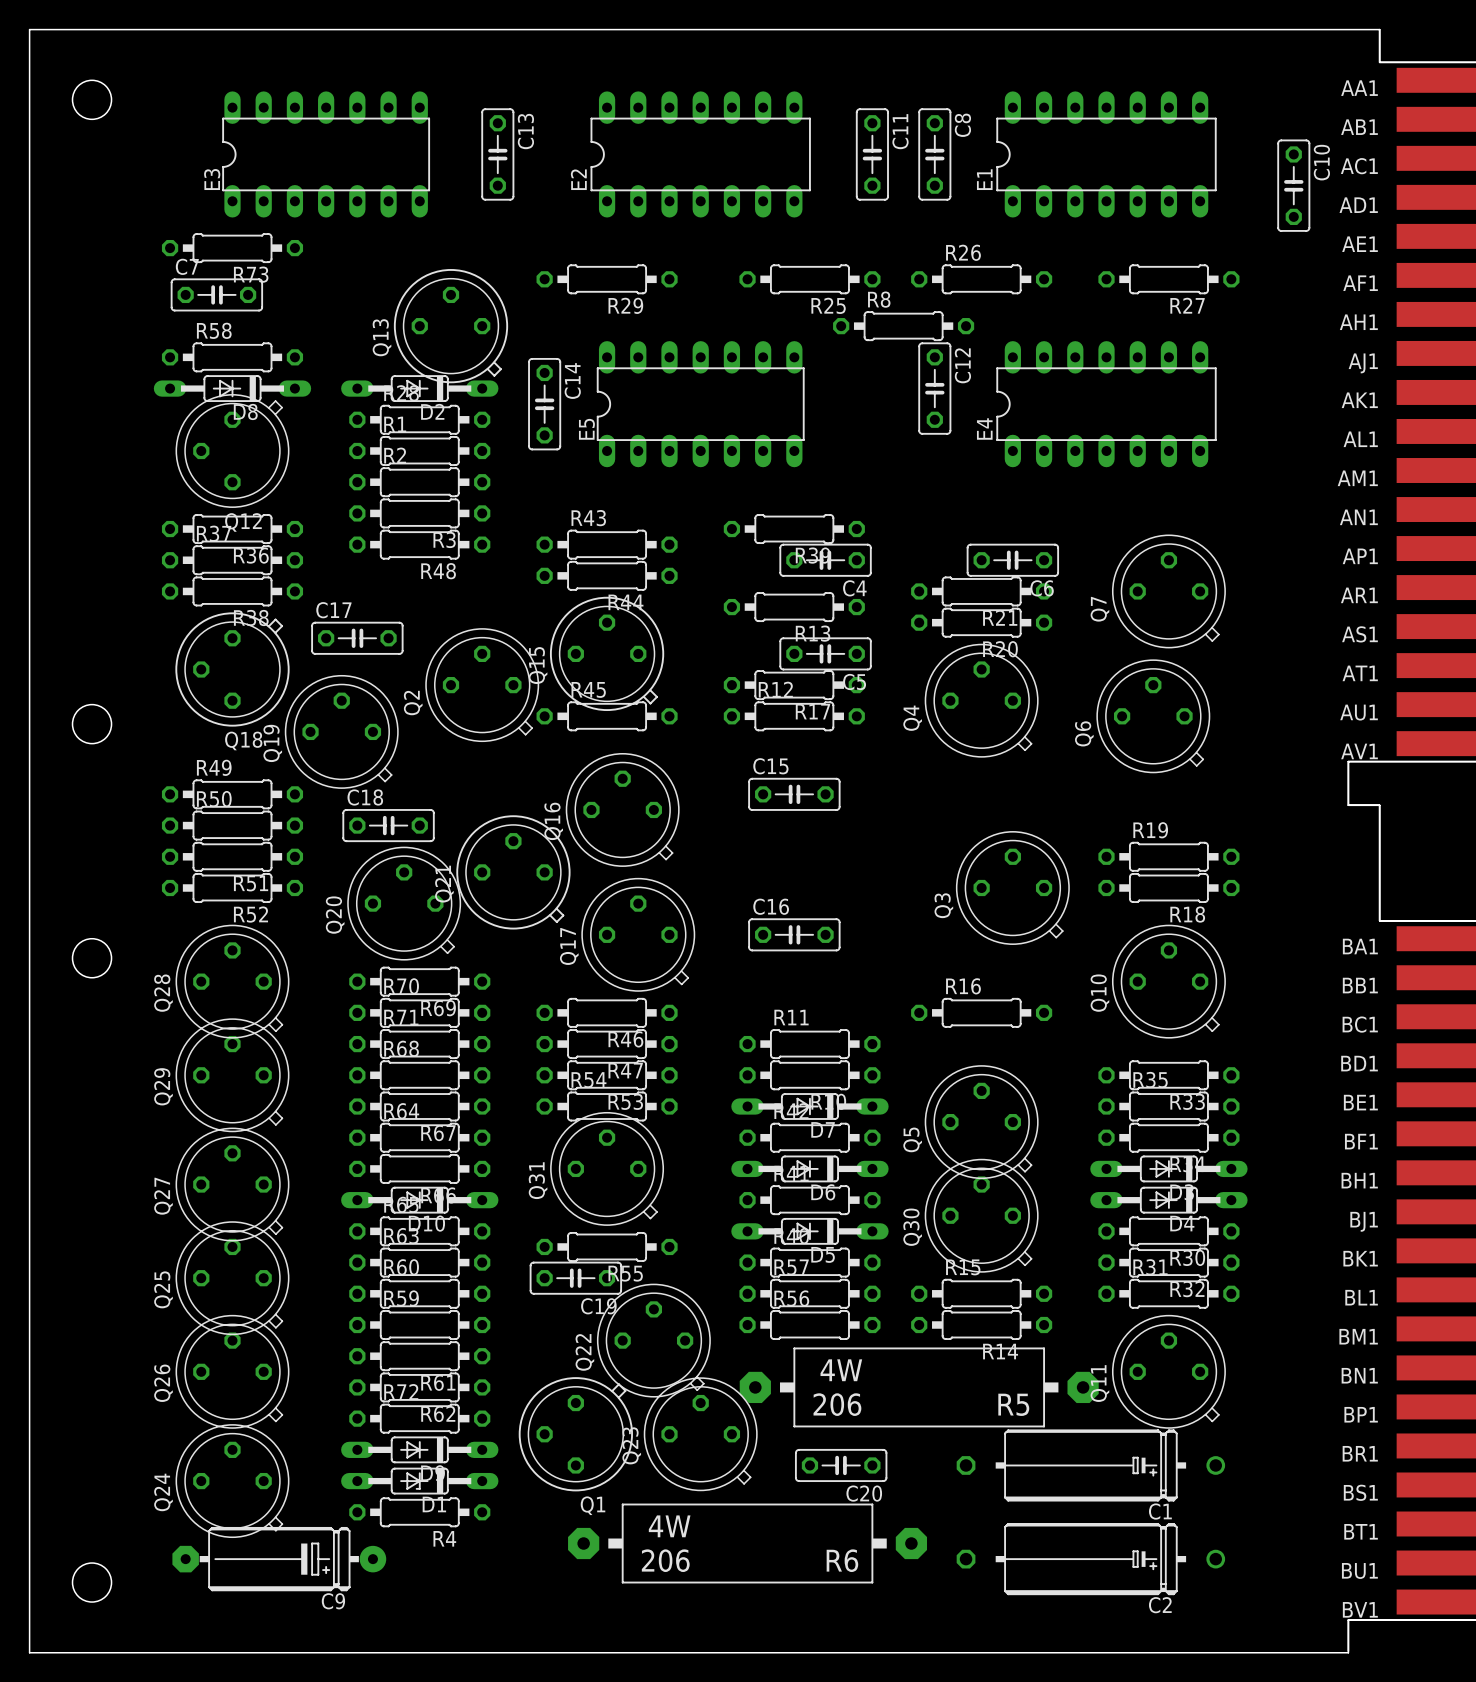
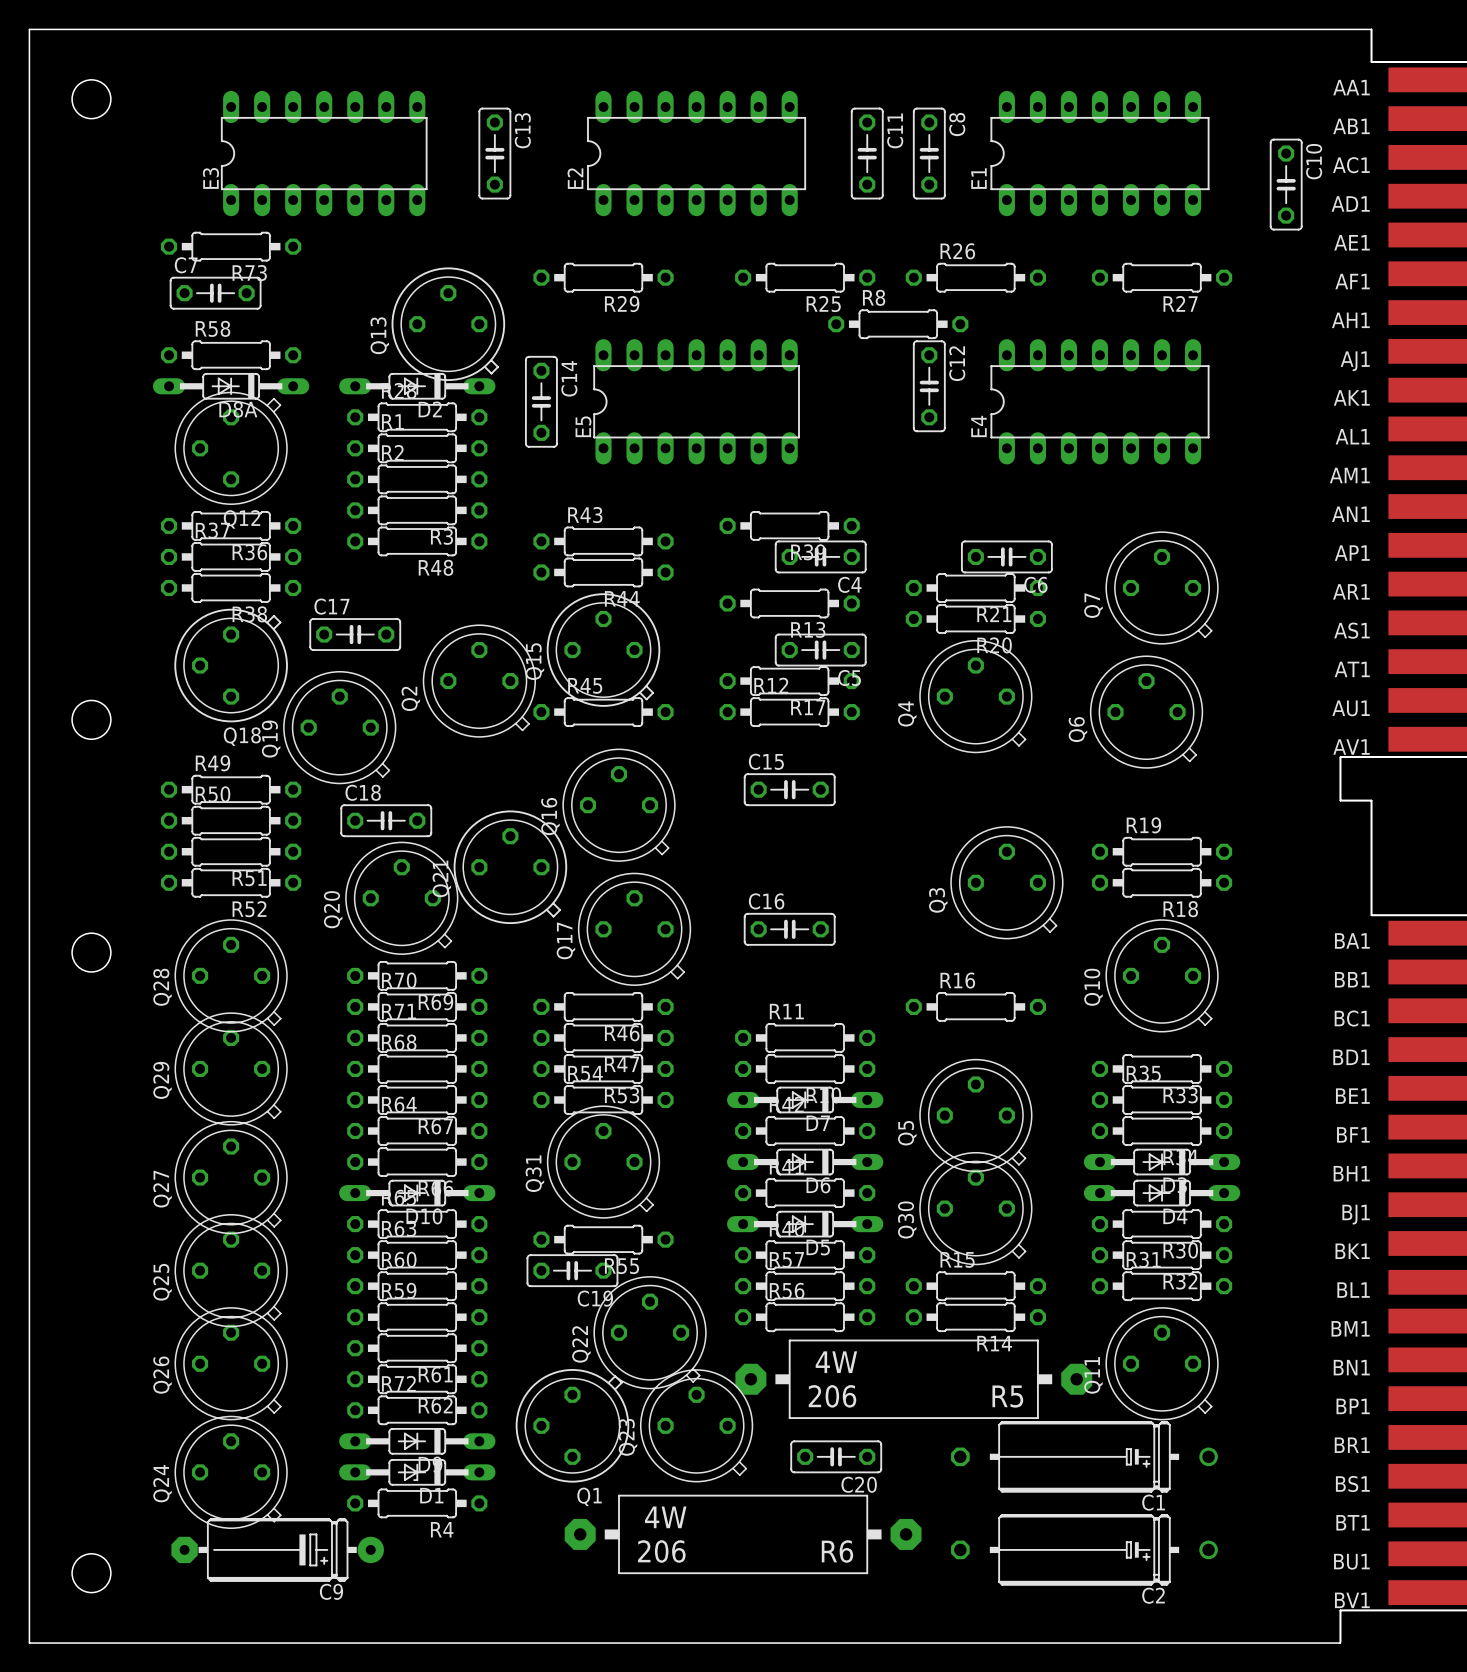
D8 name: D8 (245, 411) -> D8A (238, 409)

